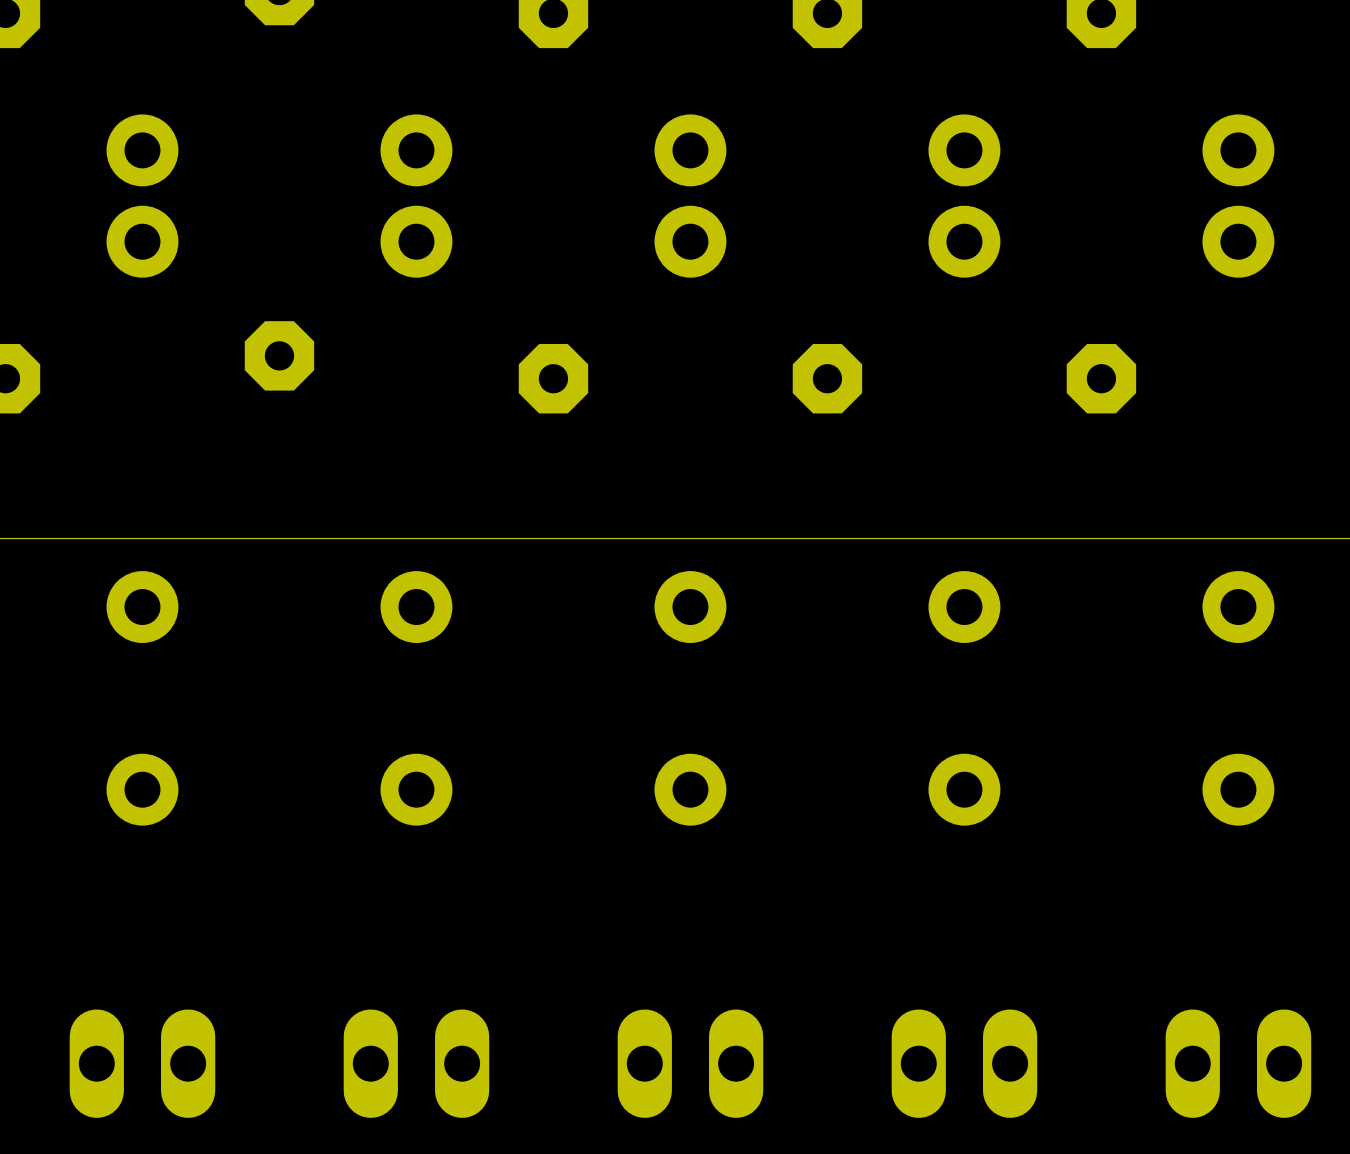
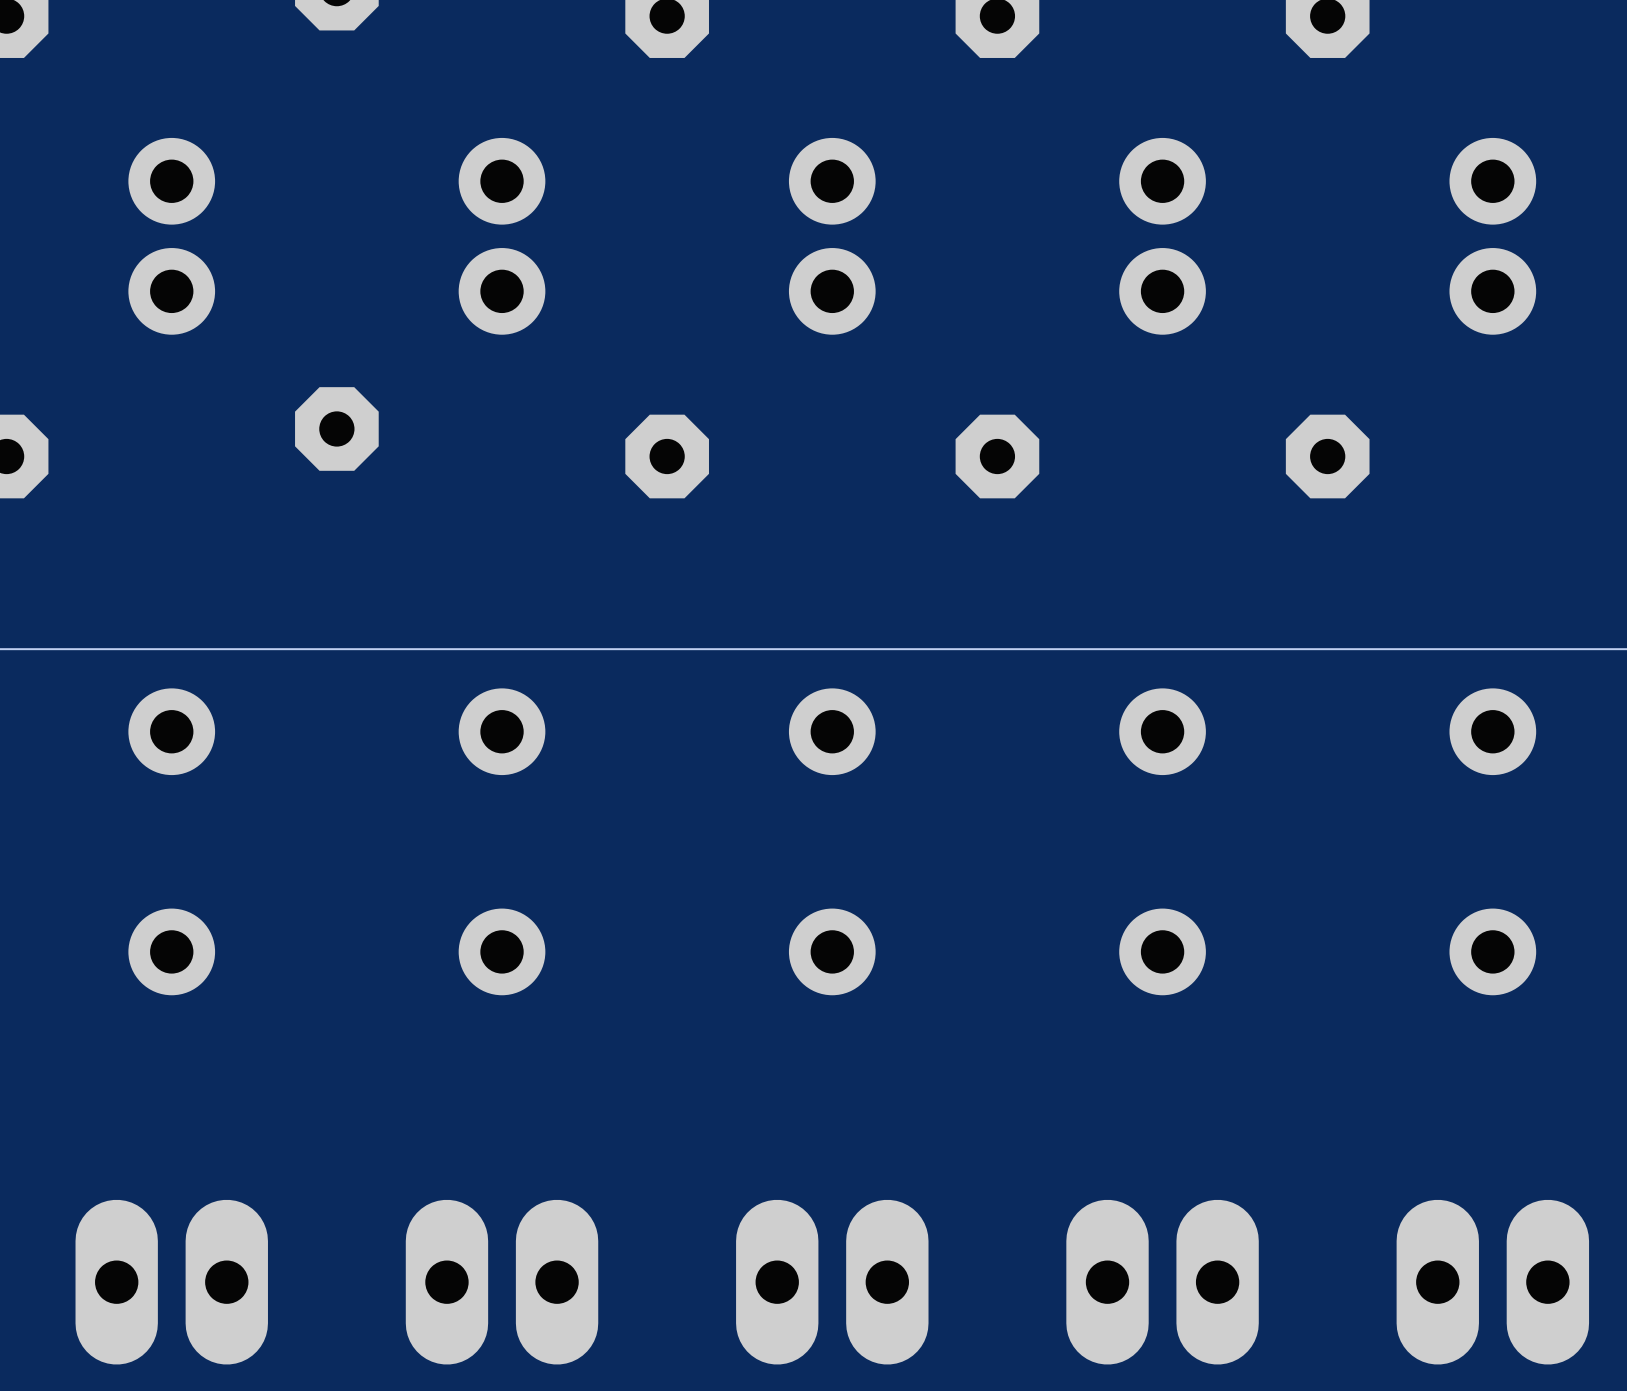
part footprint: [69, 1009, 216, 1118] -> [75, 1199, 268, 1365]
part footprint: [343, 1009, 490, 1118] -> [405, 1199, 599, 1365]
part footprint: [617, 1009, 764, 1118] -> [736, 1199, 929, 1365]
part footprint: [891, 1009, 1038, 1118] -> [1066, 1199, 1259, 1365]
part footprint: [1165, 1009, 1312, 1118] -> [1396, 1199, 1590, 1365]

